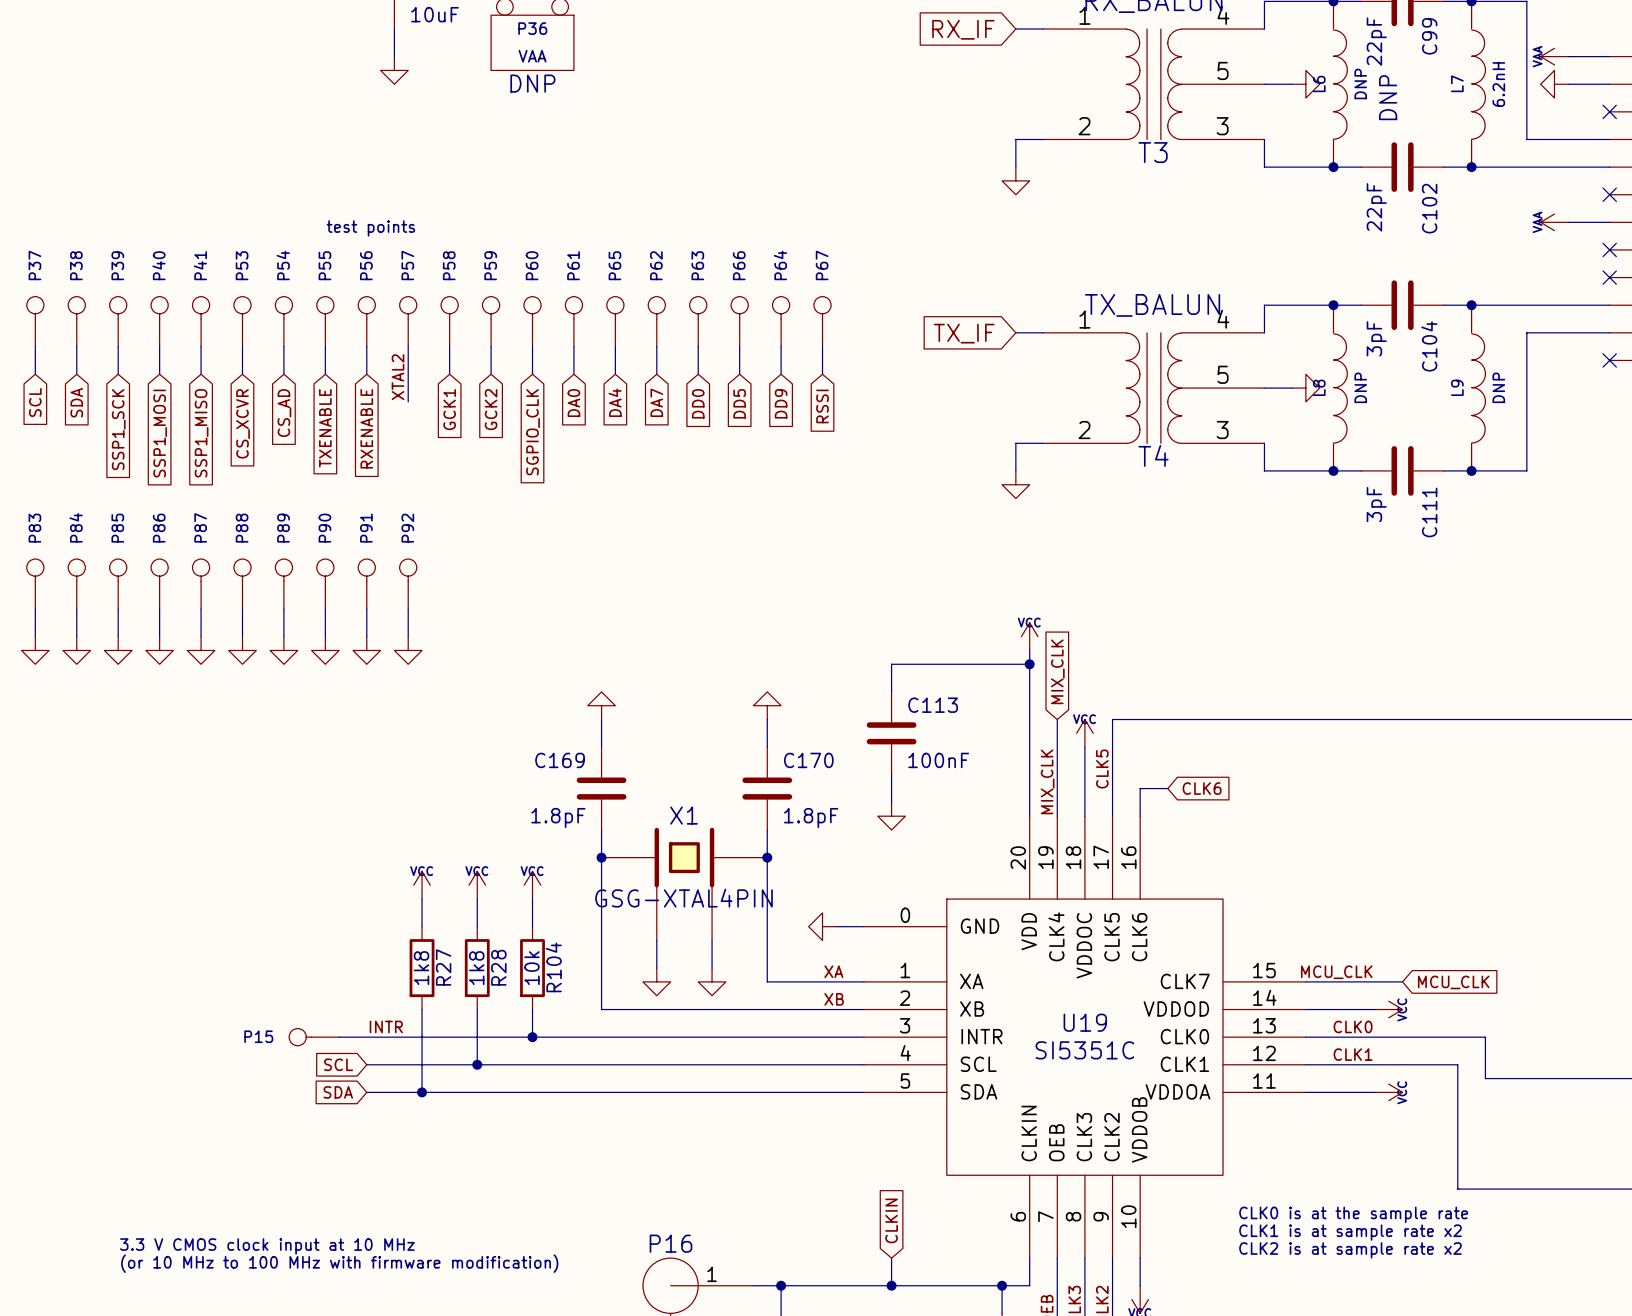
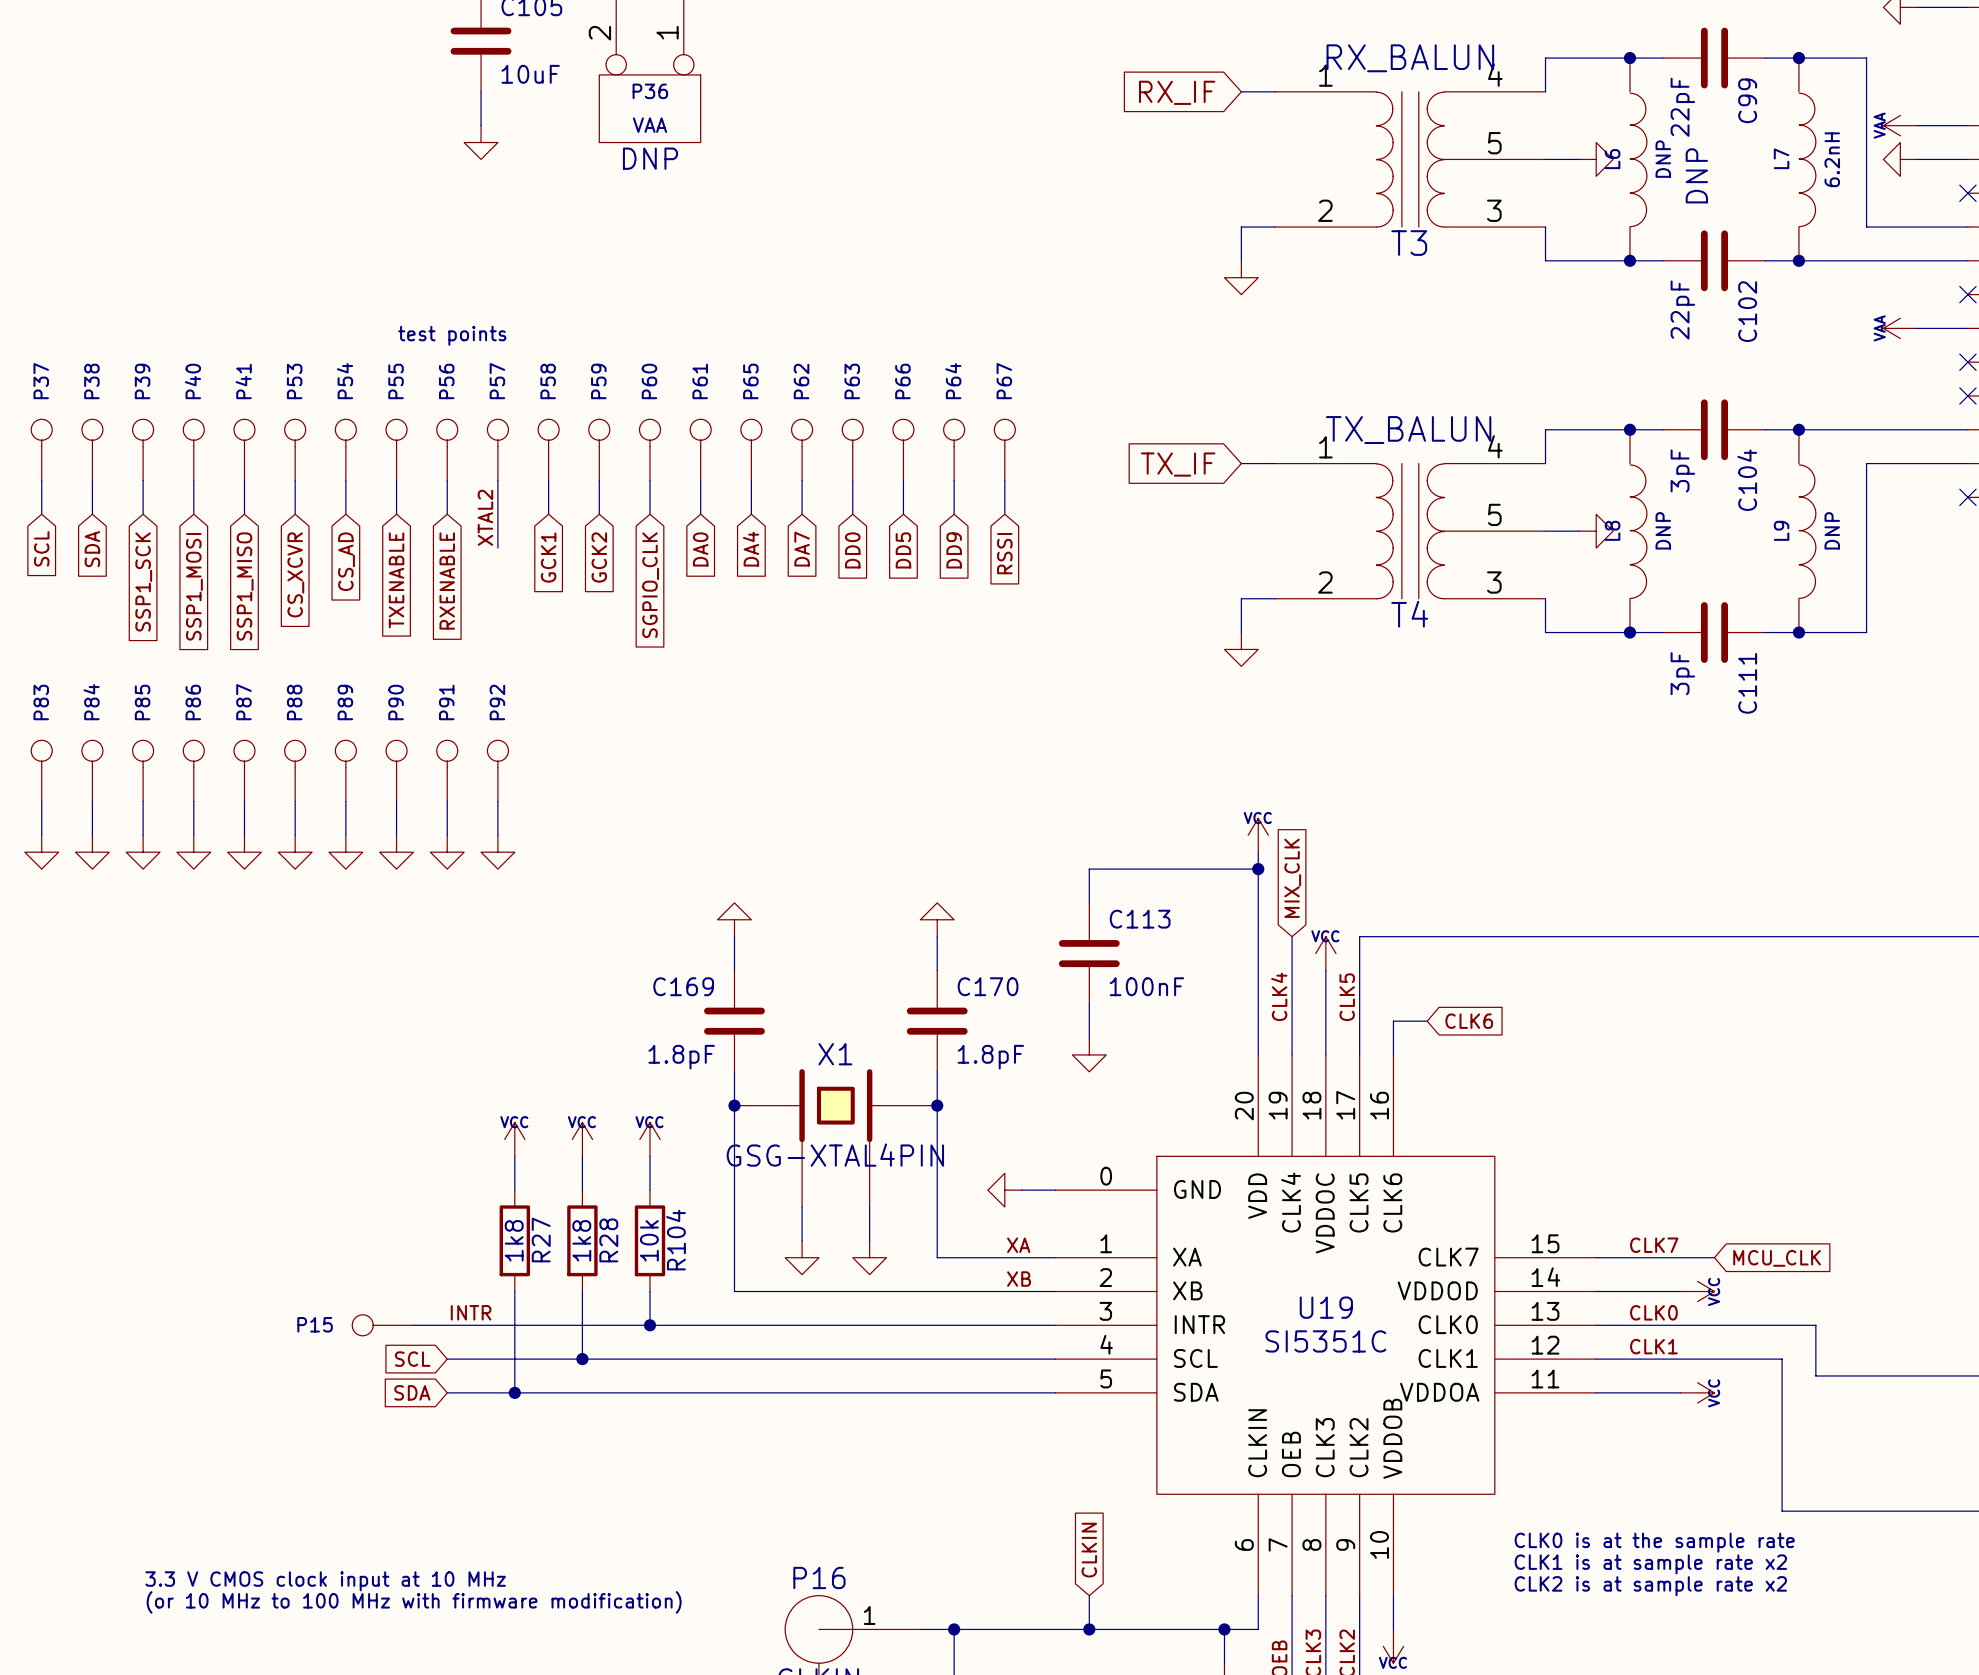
label: MIX_CLK (1047, 781) -> CLK4 (1279, 996)
label: MCU_CLK (1336, 972) -> CLK7 (1654, 1245)

